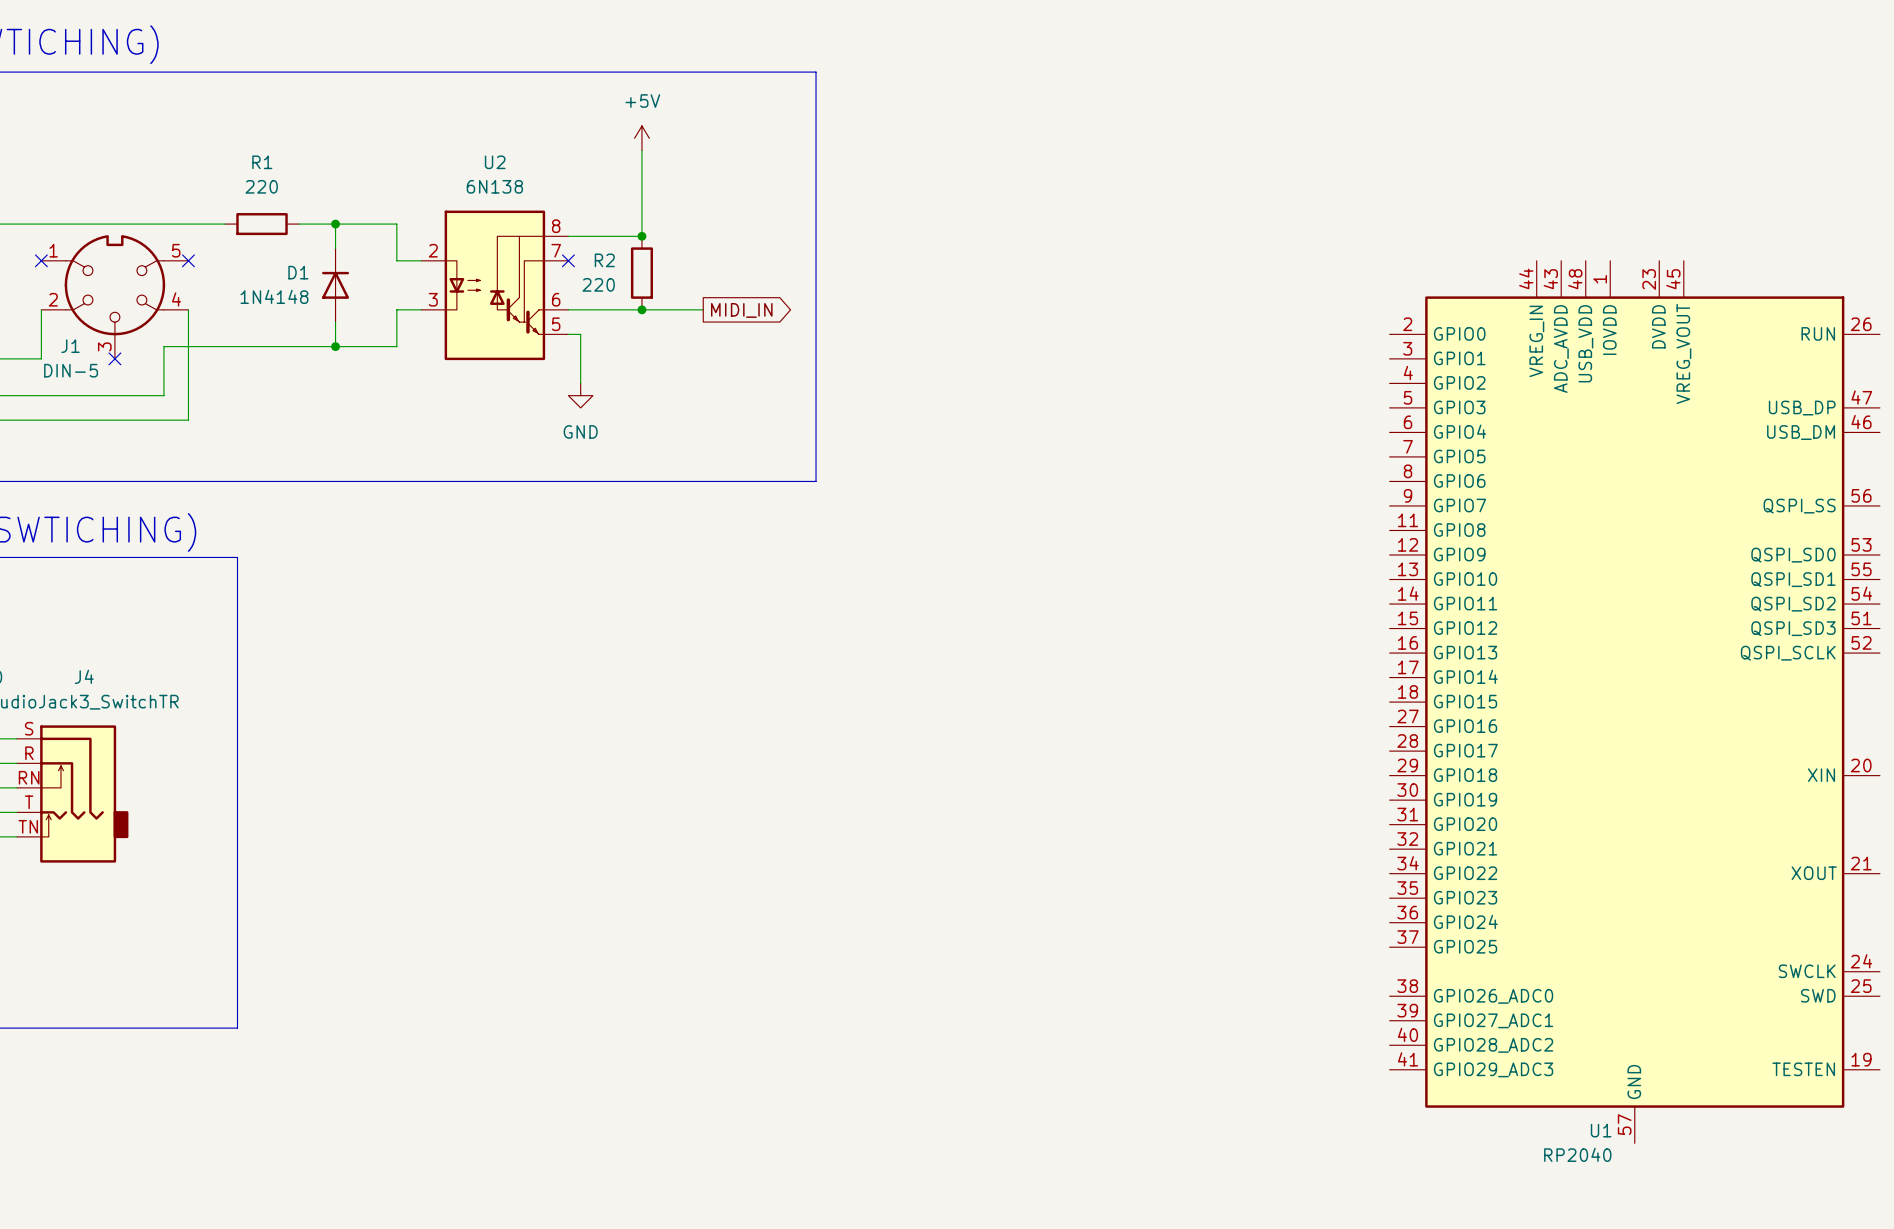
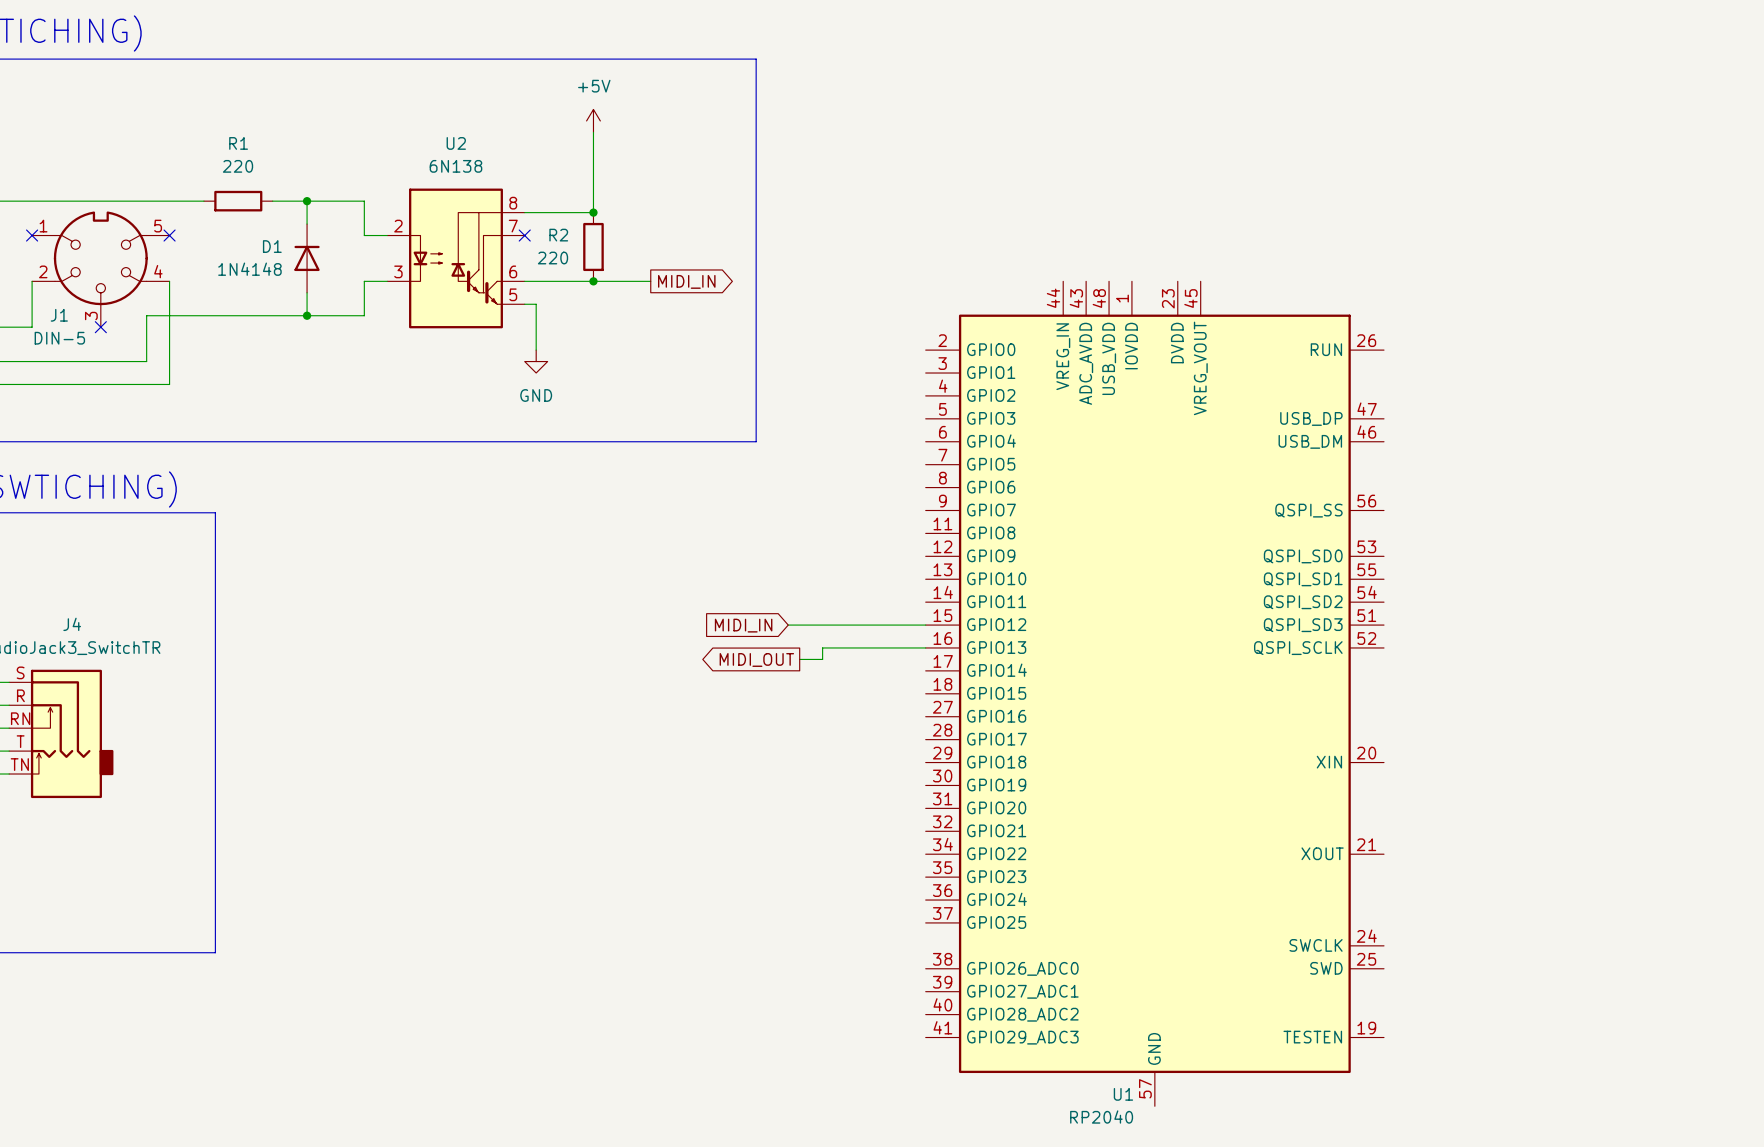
wire: none -> (788, 625) (925, 625)
global label: none -> MIDI_IN (743, 625)
wire: none -> (925, 647) (822, 647) (822, 659) (799, 659)
U1 position: (1634, 702) -> (1154, 693)
global label: none -> MIDI_OUT (756, 659)

